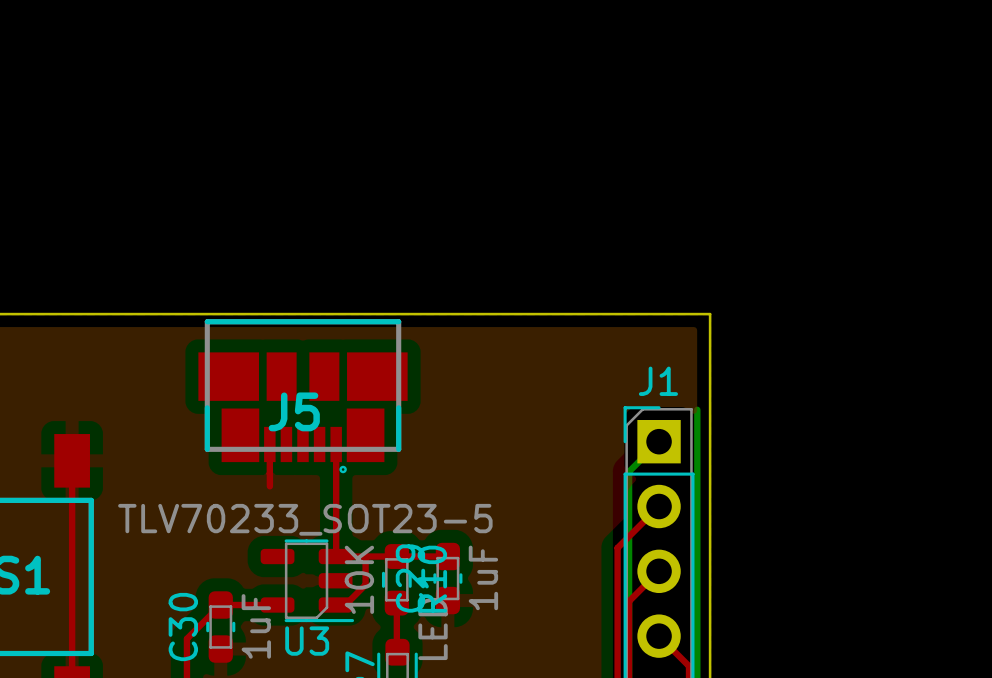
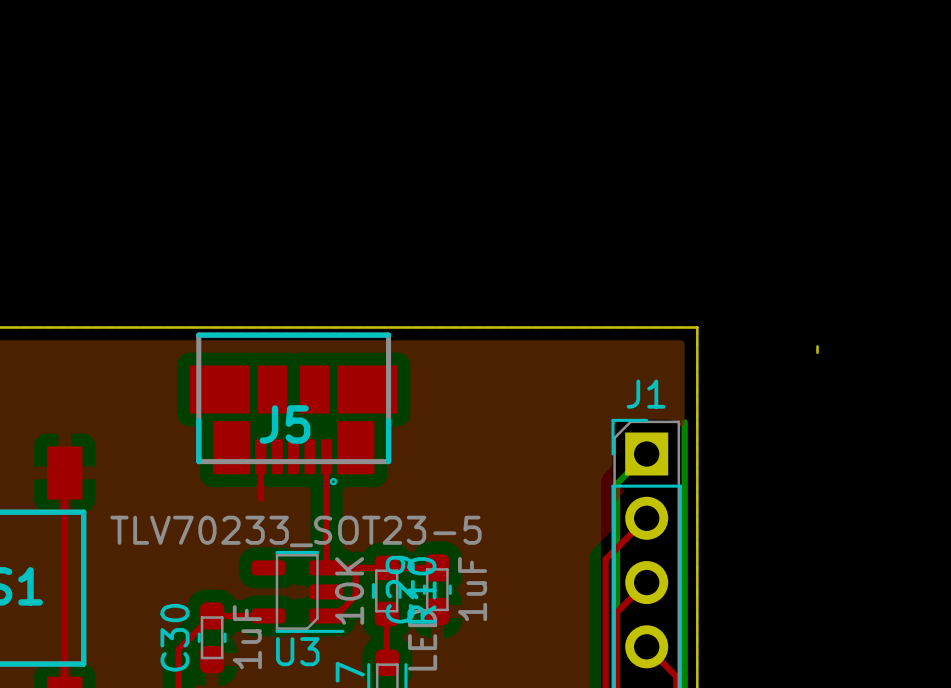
board edge: none -> (817, 346) (817, 352)

